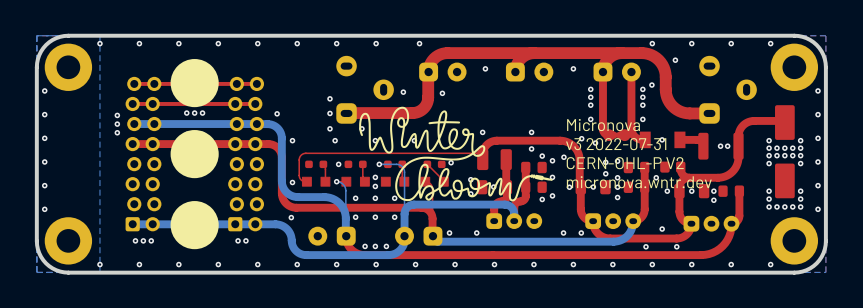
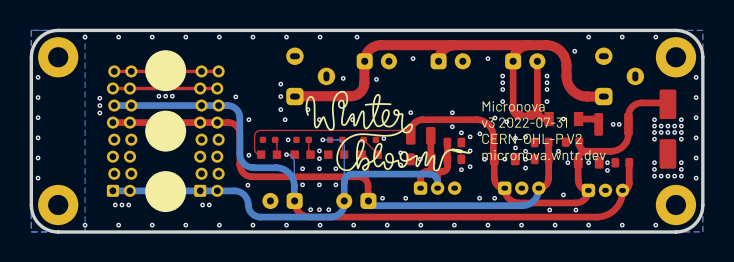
via: (652, 43) -> none
via: (651, 85) -> none

